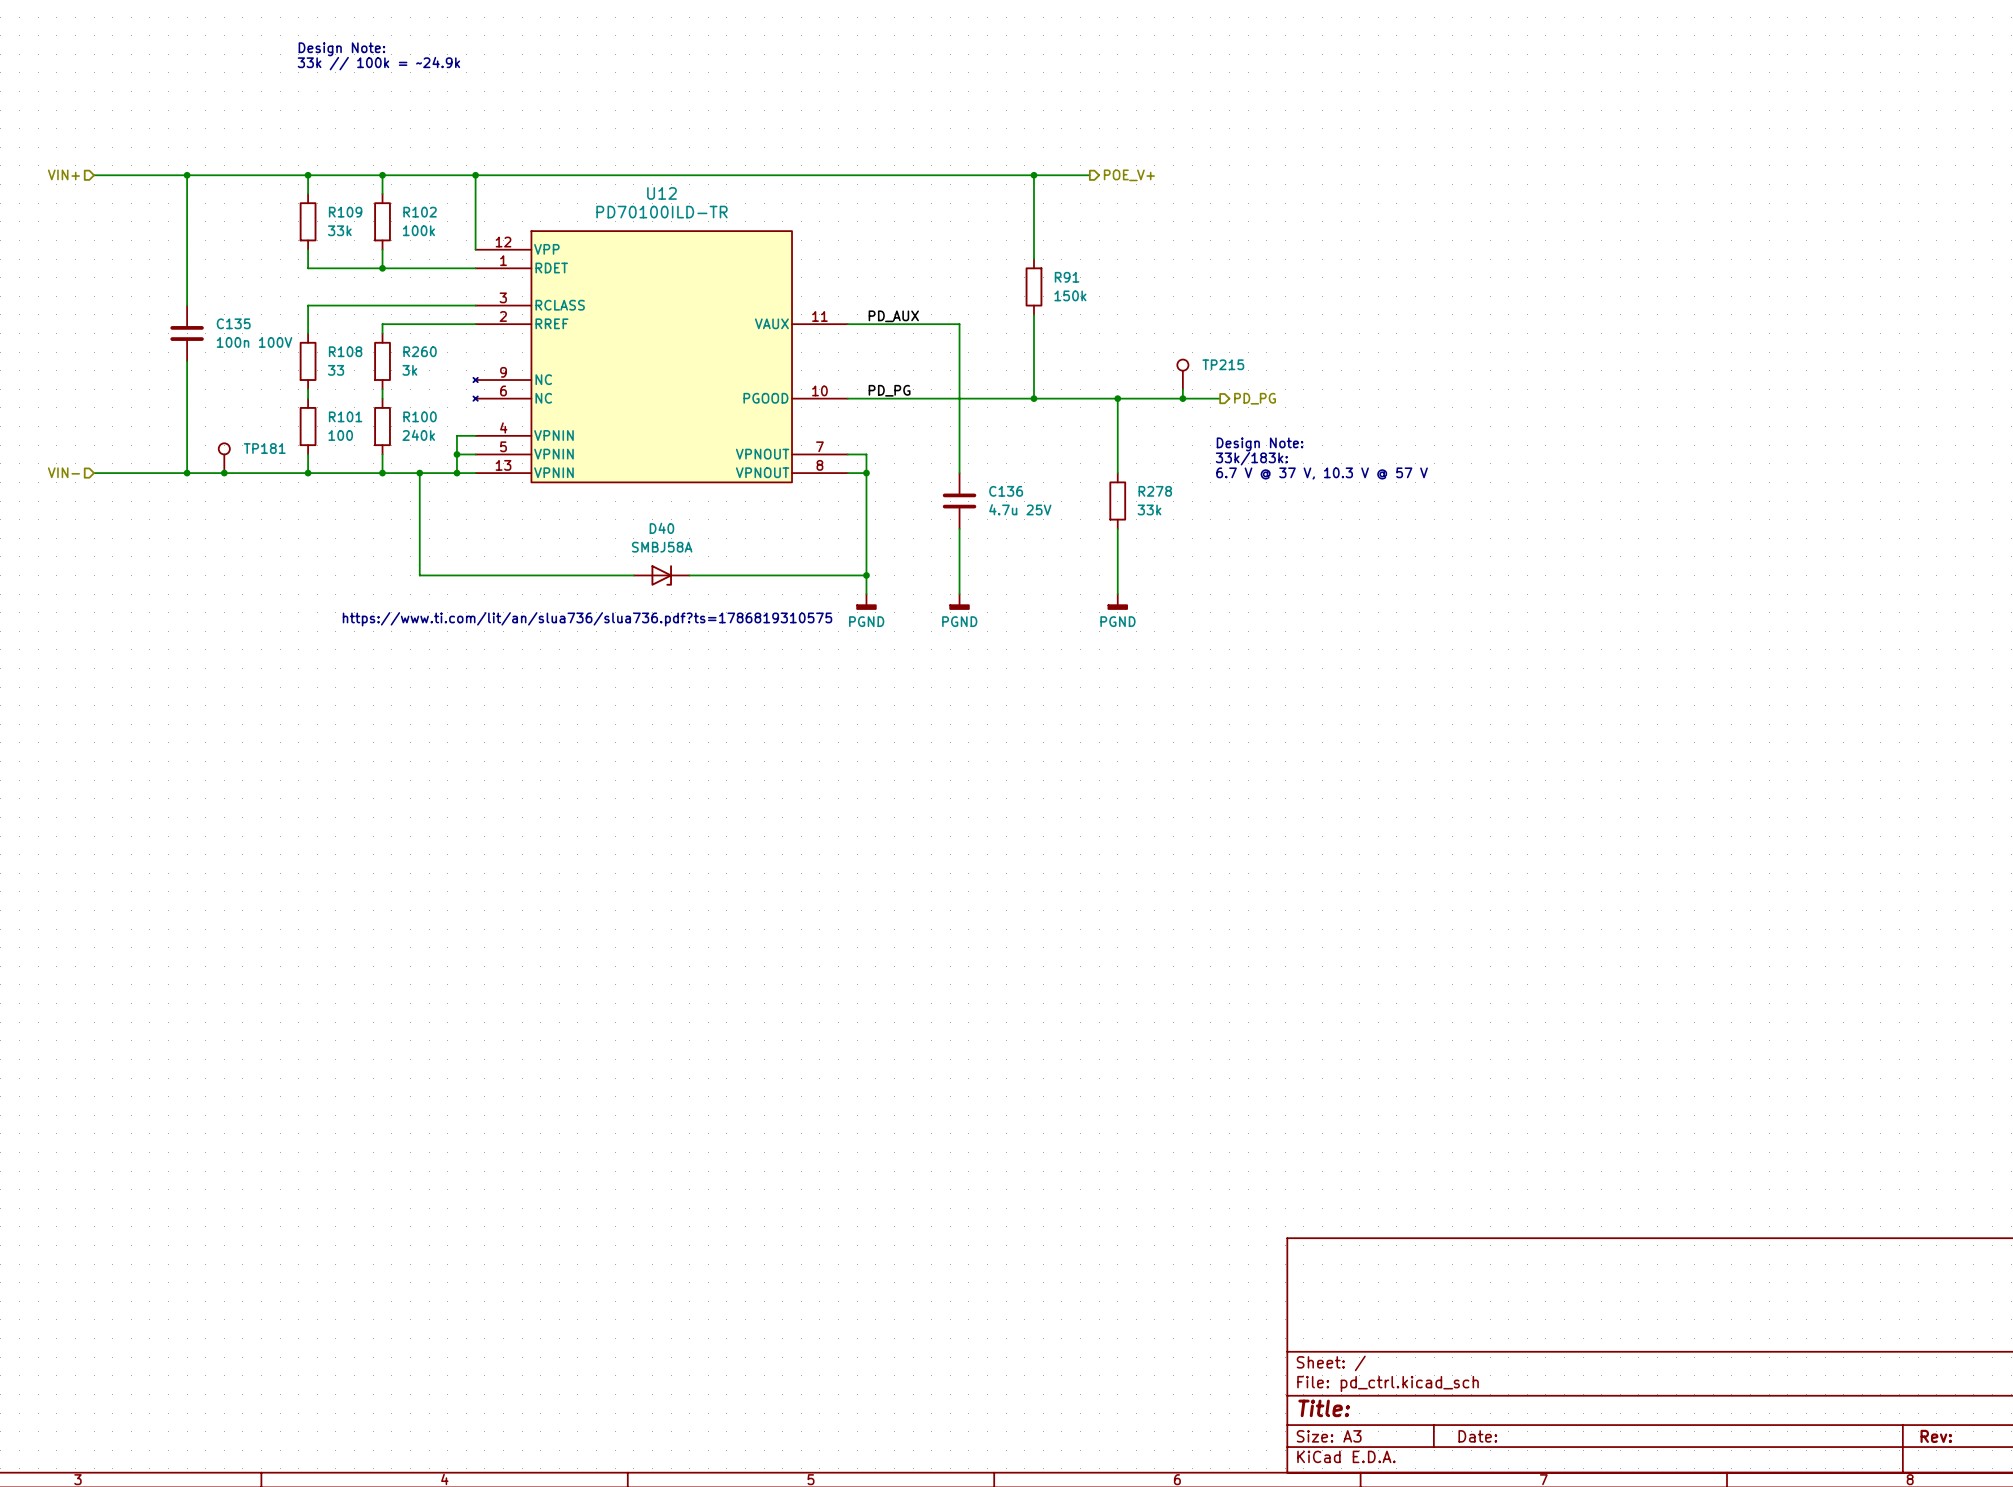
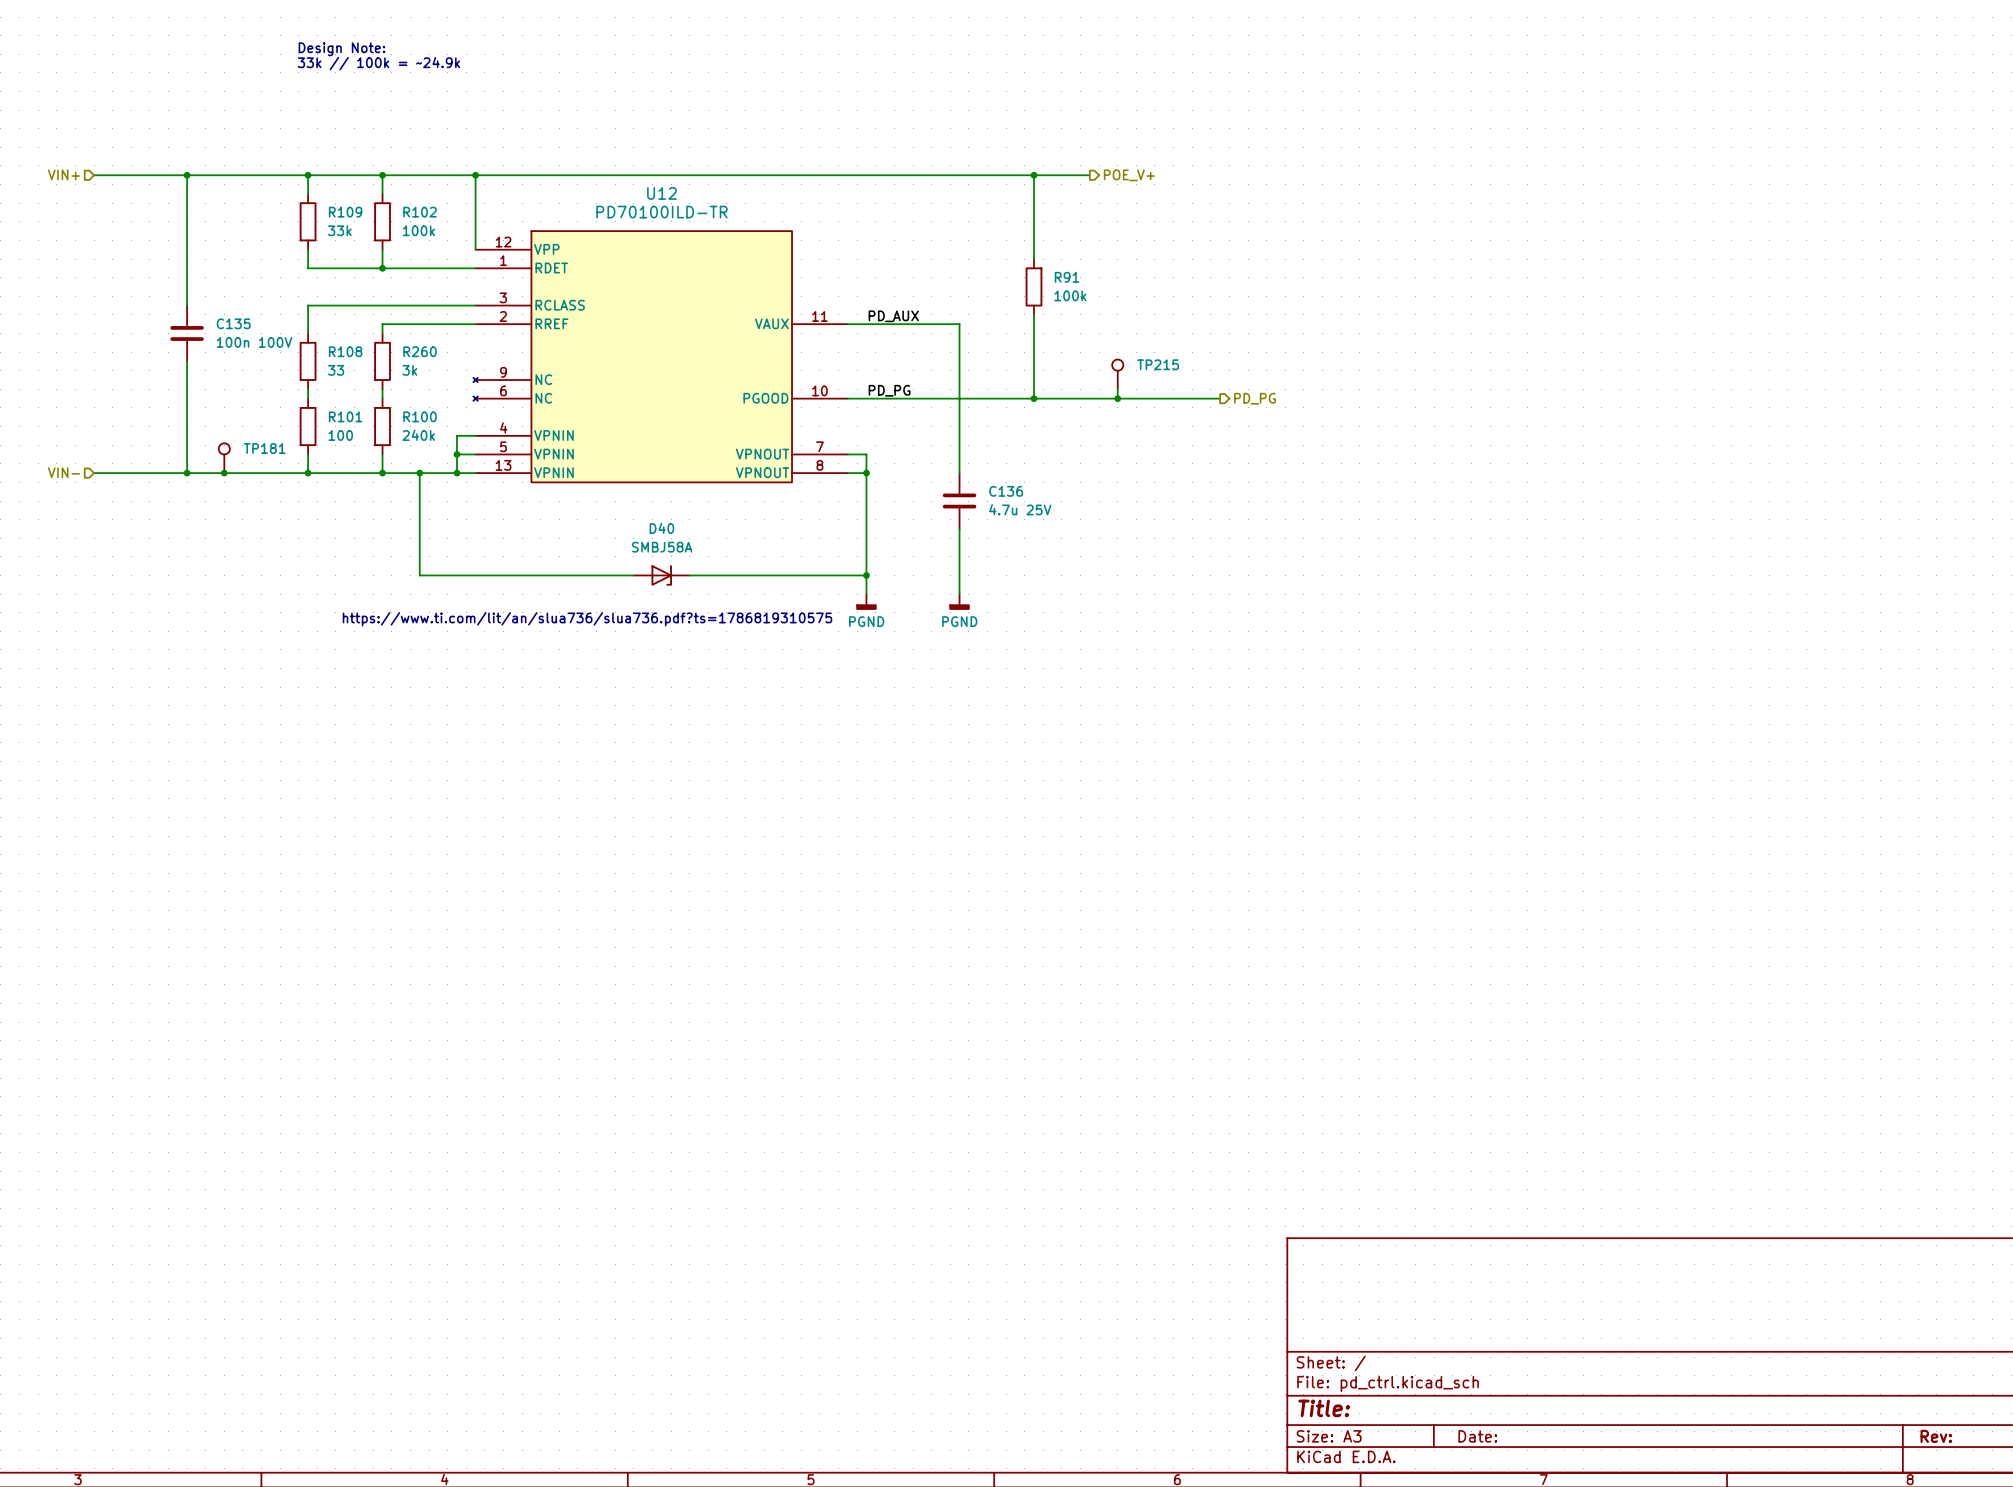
R91 value: 150k (1070, 295) -> 100k (1070, 295)
TP215 position: (1182, 374) -> (1117, 374)
wire: (1182, 389) (1182, 398) -> none
wire: (1117, 398) (1117, 473) -> (1117, 398) (1117, 389)
junction: (1182, 398) -> none
text: Design Note: (1260, 444) -> none
text: 33k/183k: (1251, 458) -> none
text: 6.7 V @ 37 V, 10.3 V @ 57 V (1322, 473) -> none
R278: 33k (1117, 501) -> none
wire: (1117, 528) (1117, 594) -> none
power symbol: PGND (1117, 601) -> none

